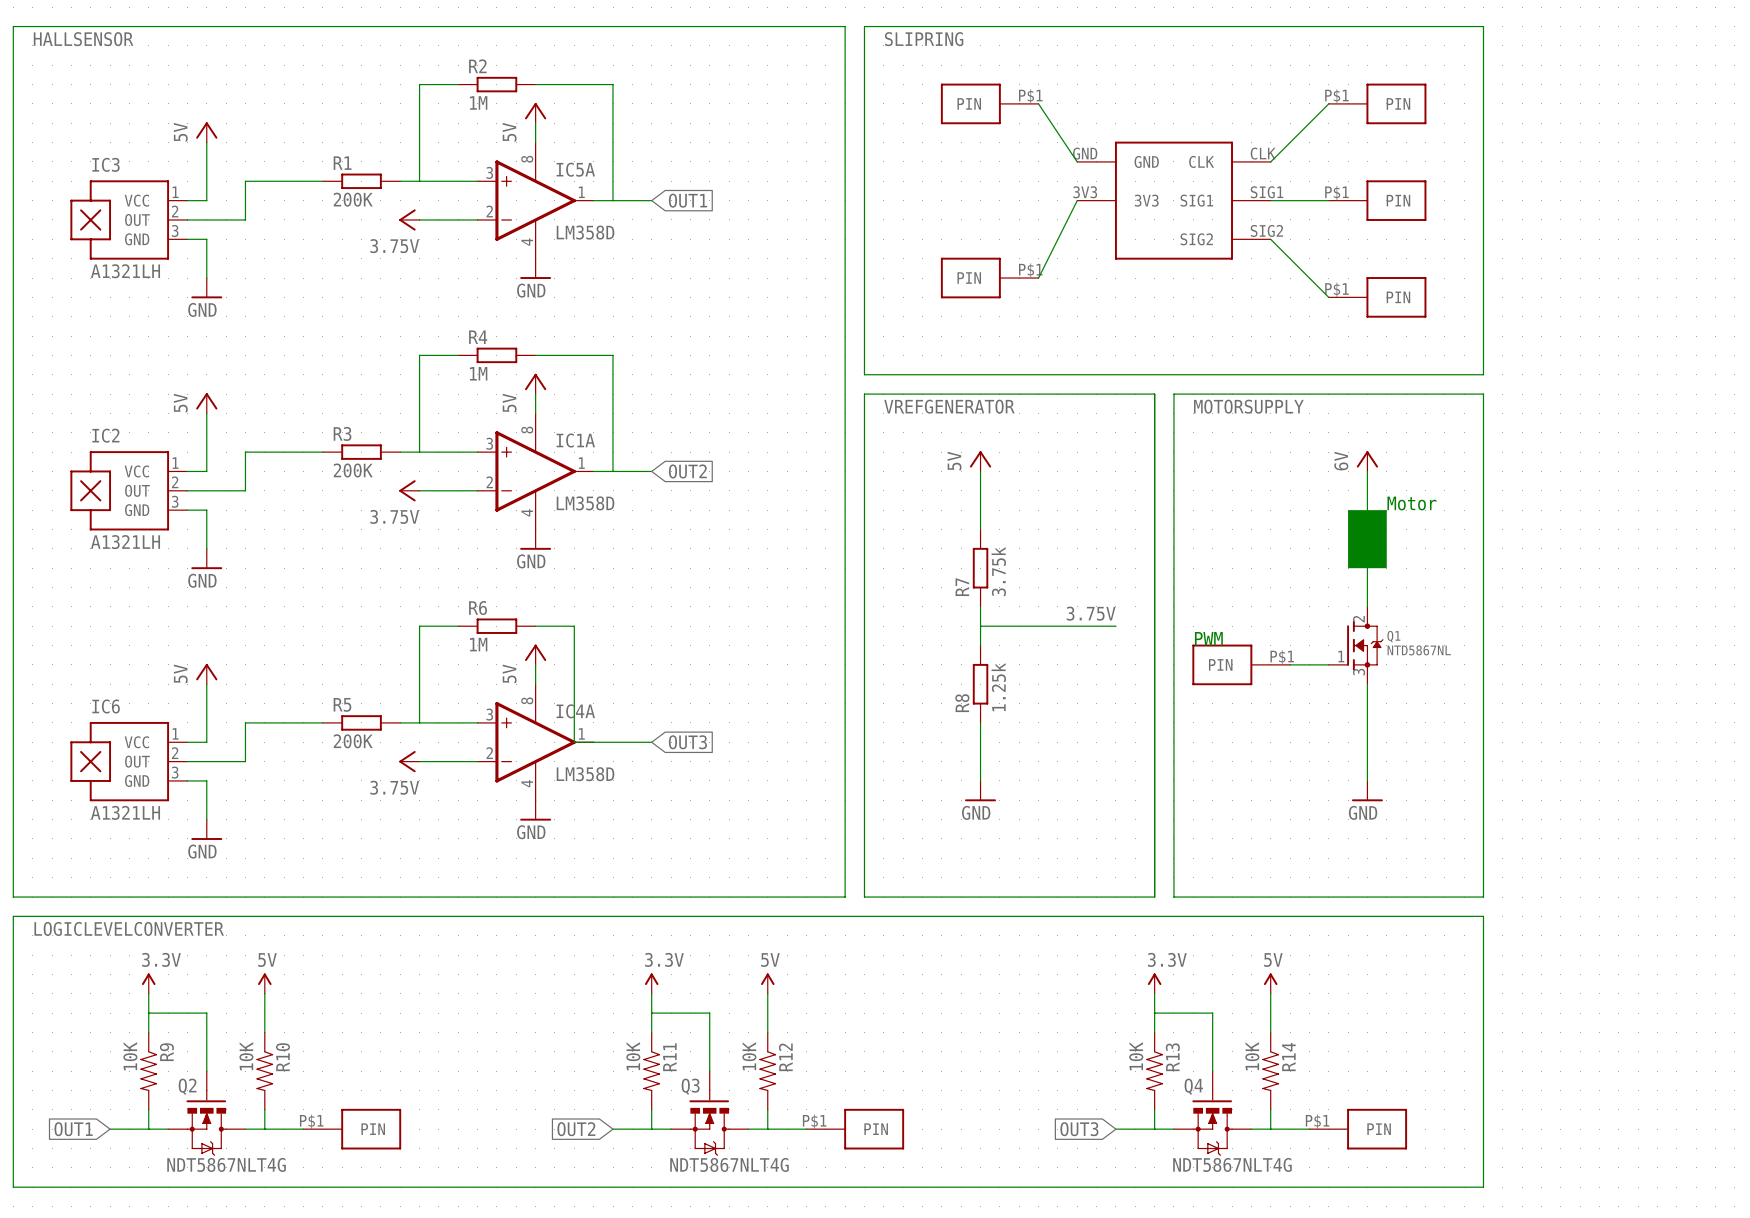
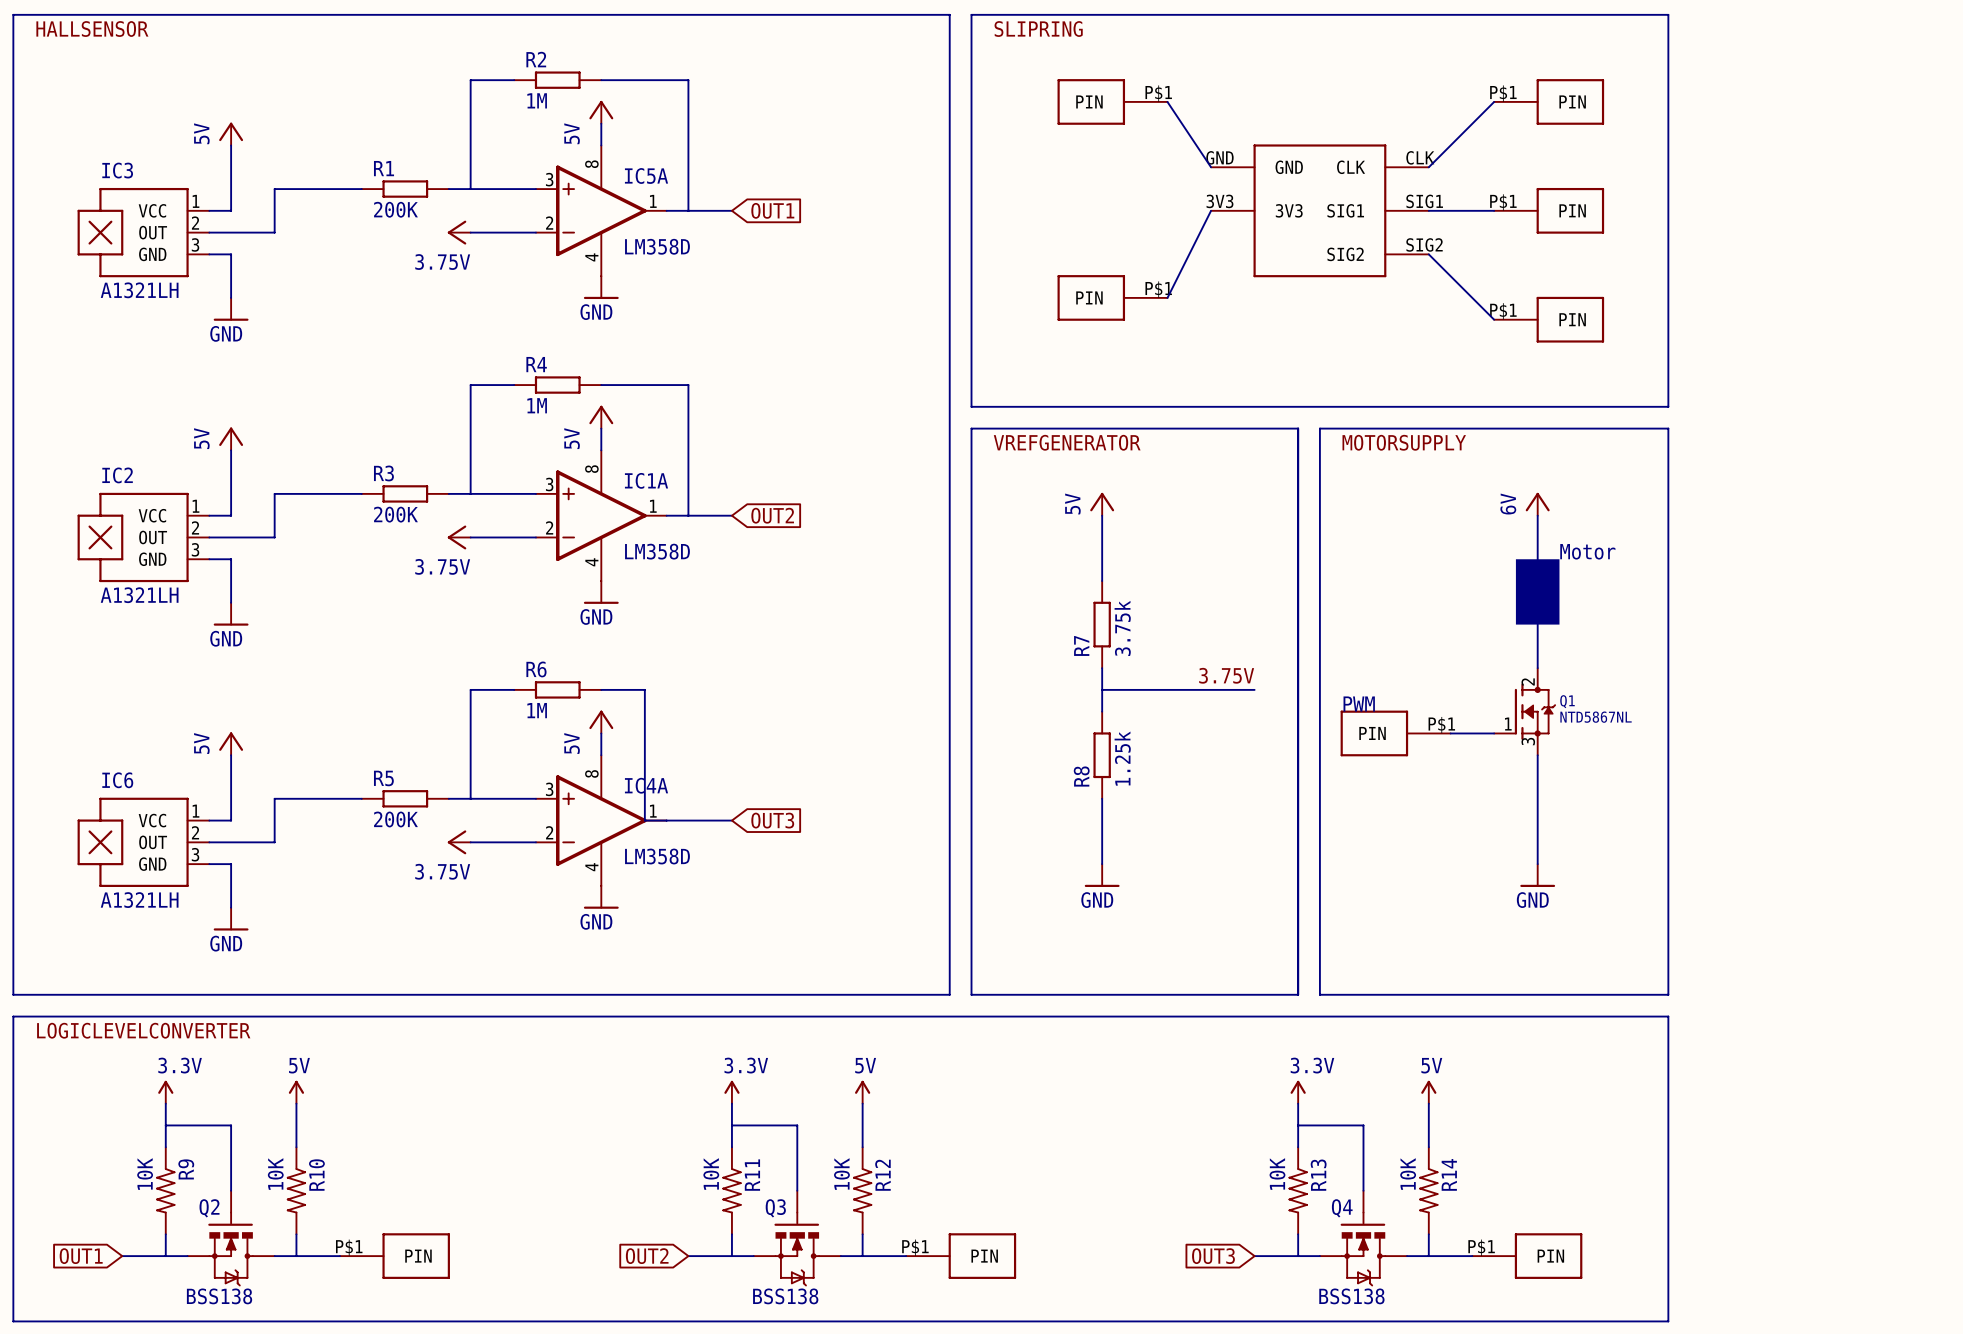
Q2 value: NDT5867NLT4G (226, 1164) -> BSS138 (219, 1296)
Q3 value: NDT5867NLT4G (729, 1164) -> BSS138 (785, 1296)
Q4 value: NDT5867NLT4G (1232, 1164) -> BSS138 (1351, 1296)

